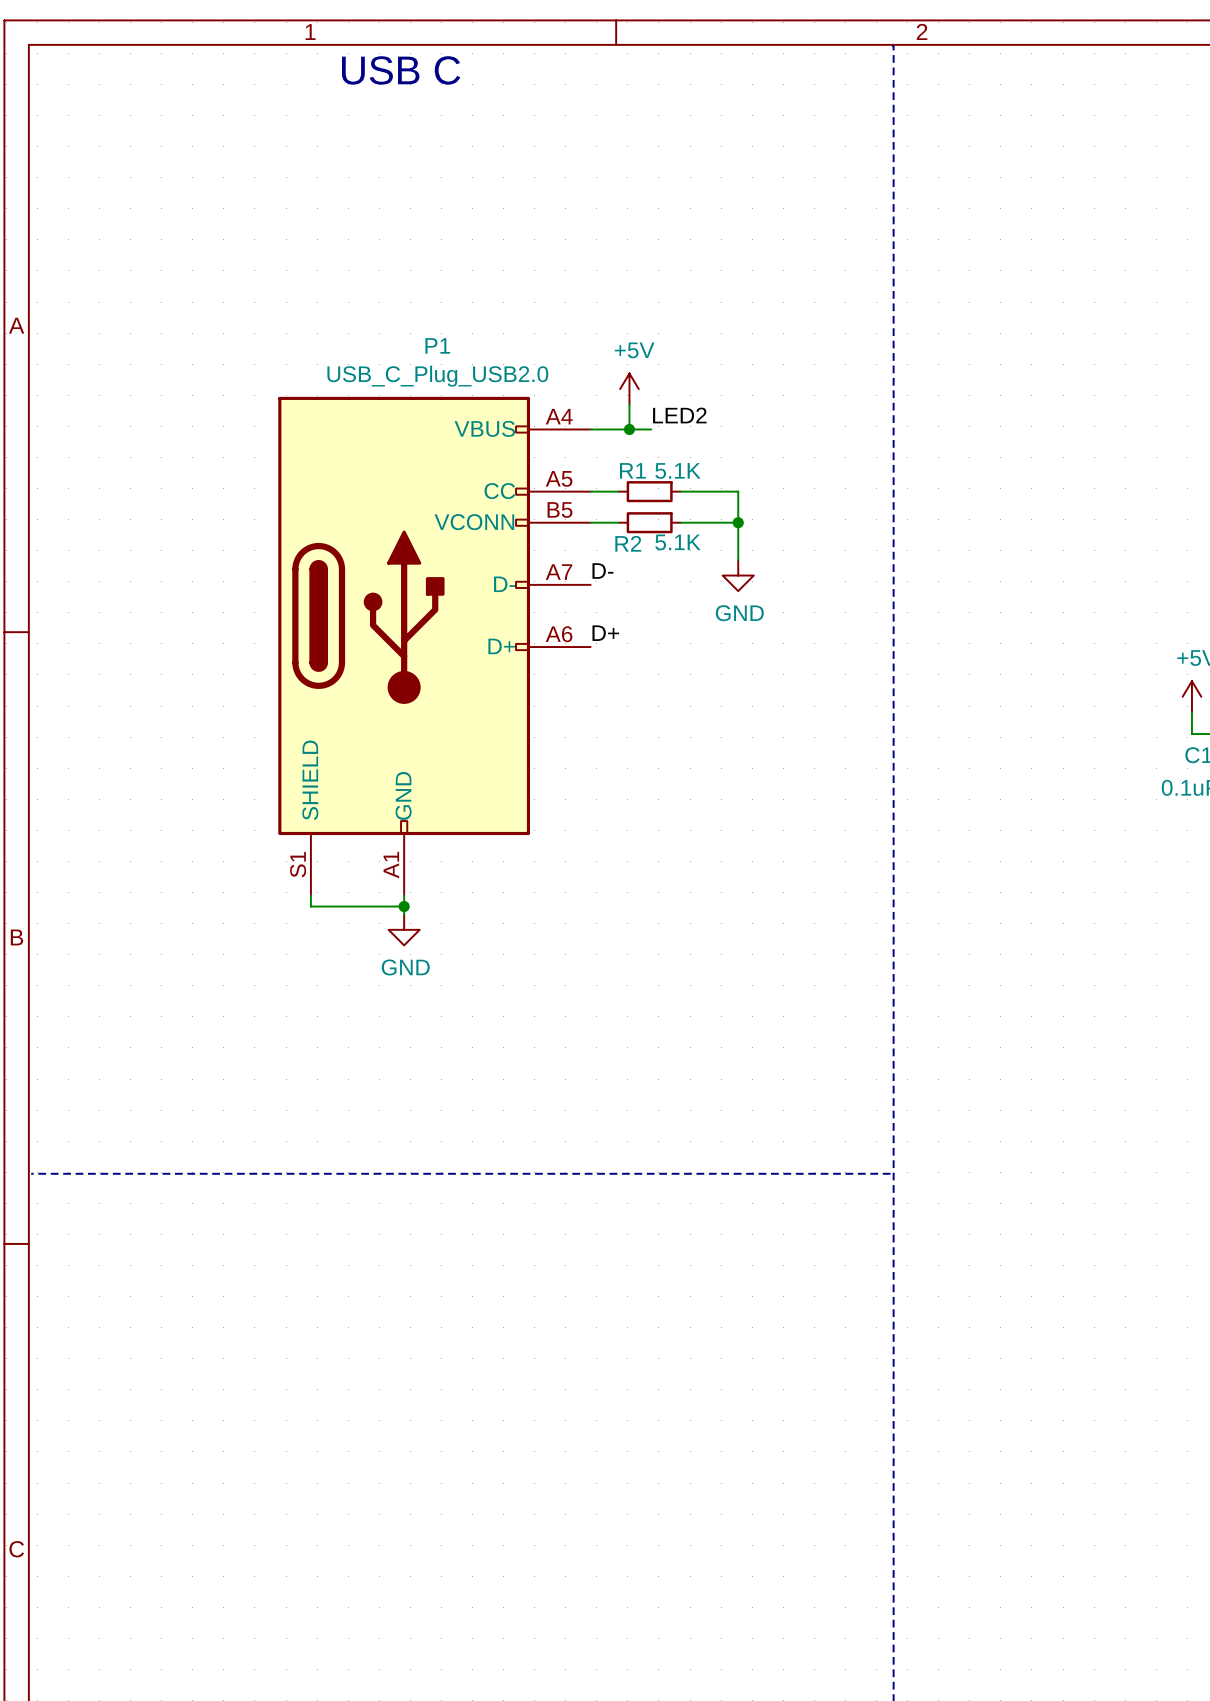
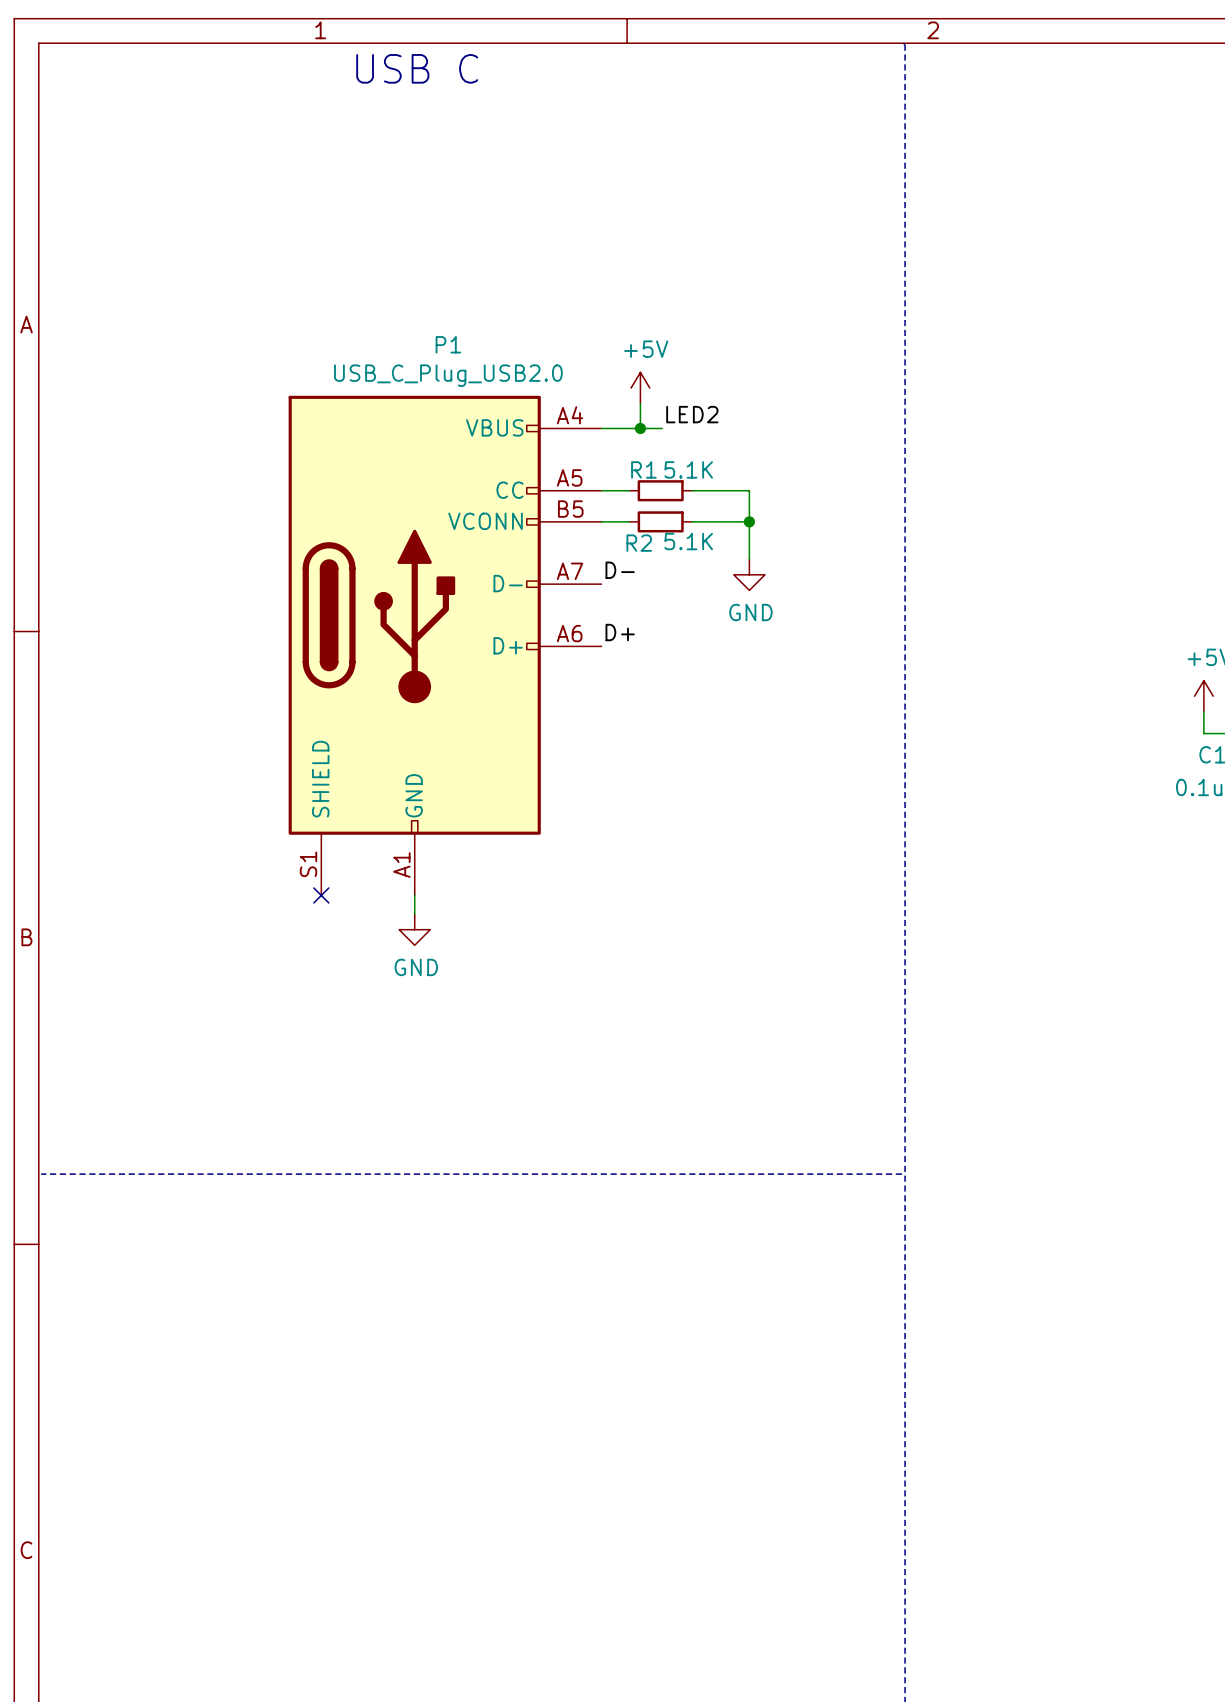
wire: (310, 895) (310, 906) (404, 906) -> none
no-connect mark: none -> (321, 895)
junction: (404, 906) -> none

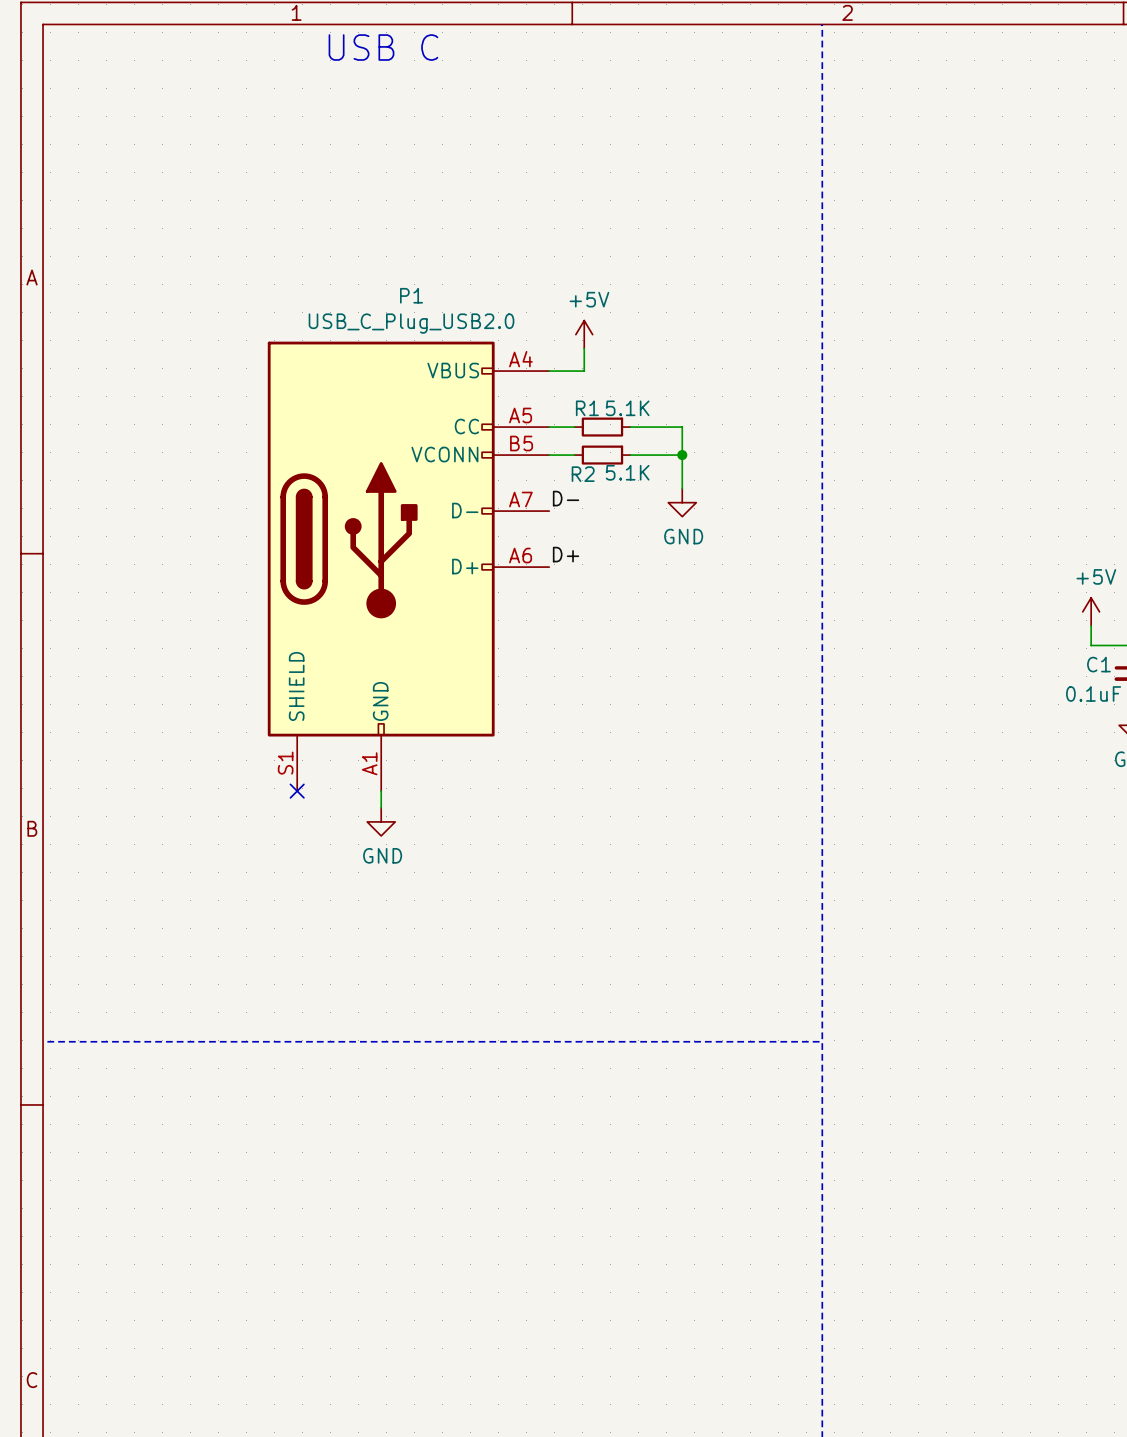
label: LED2 (692, 414) -> none
wire: (640, 428) (662, 428) -> none
junction: (640, 428) -> none

